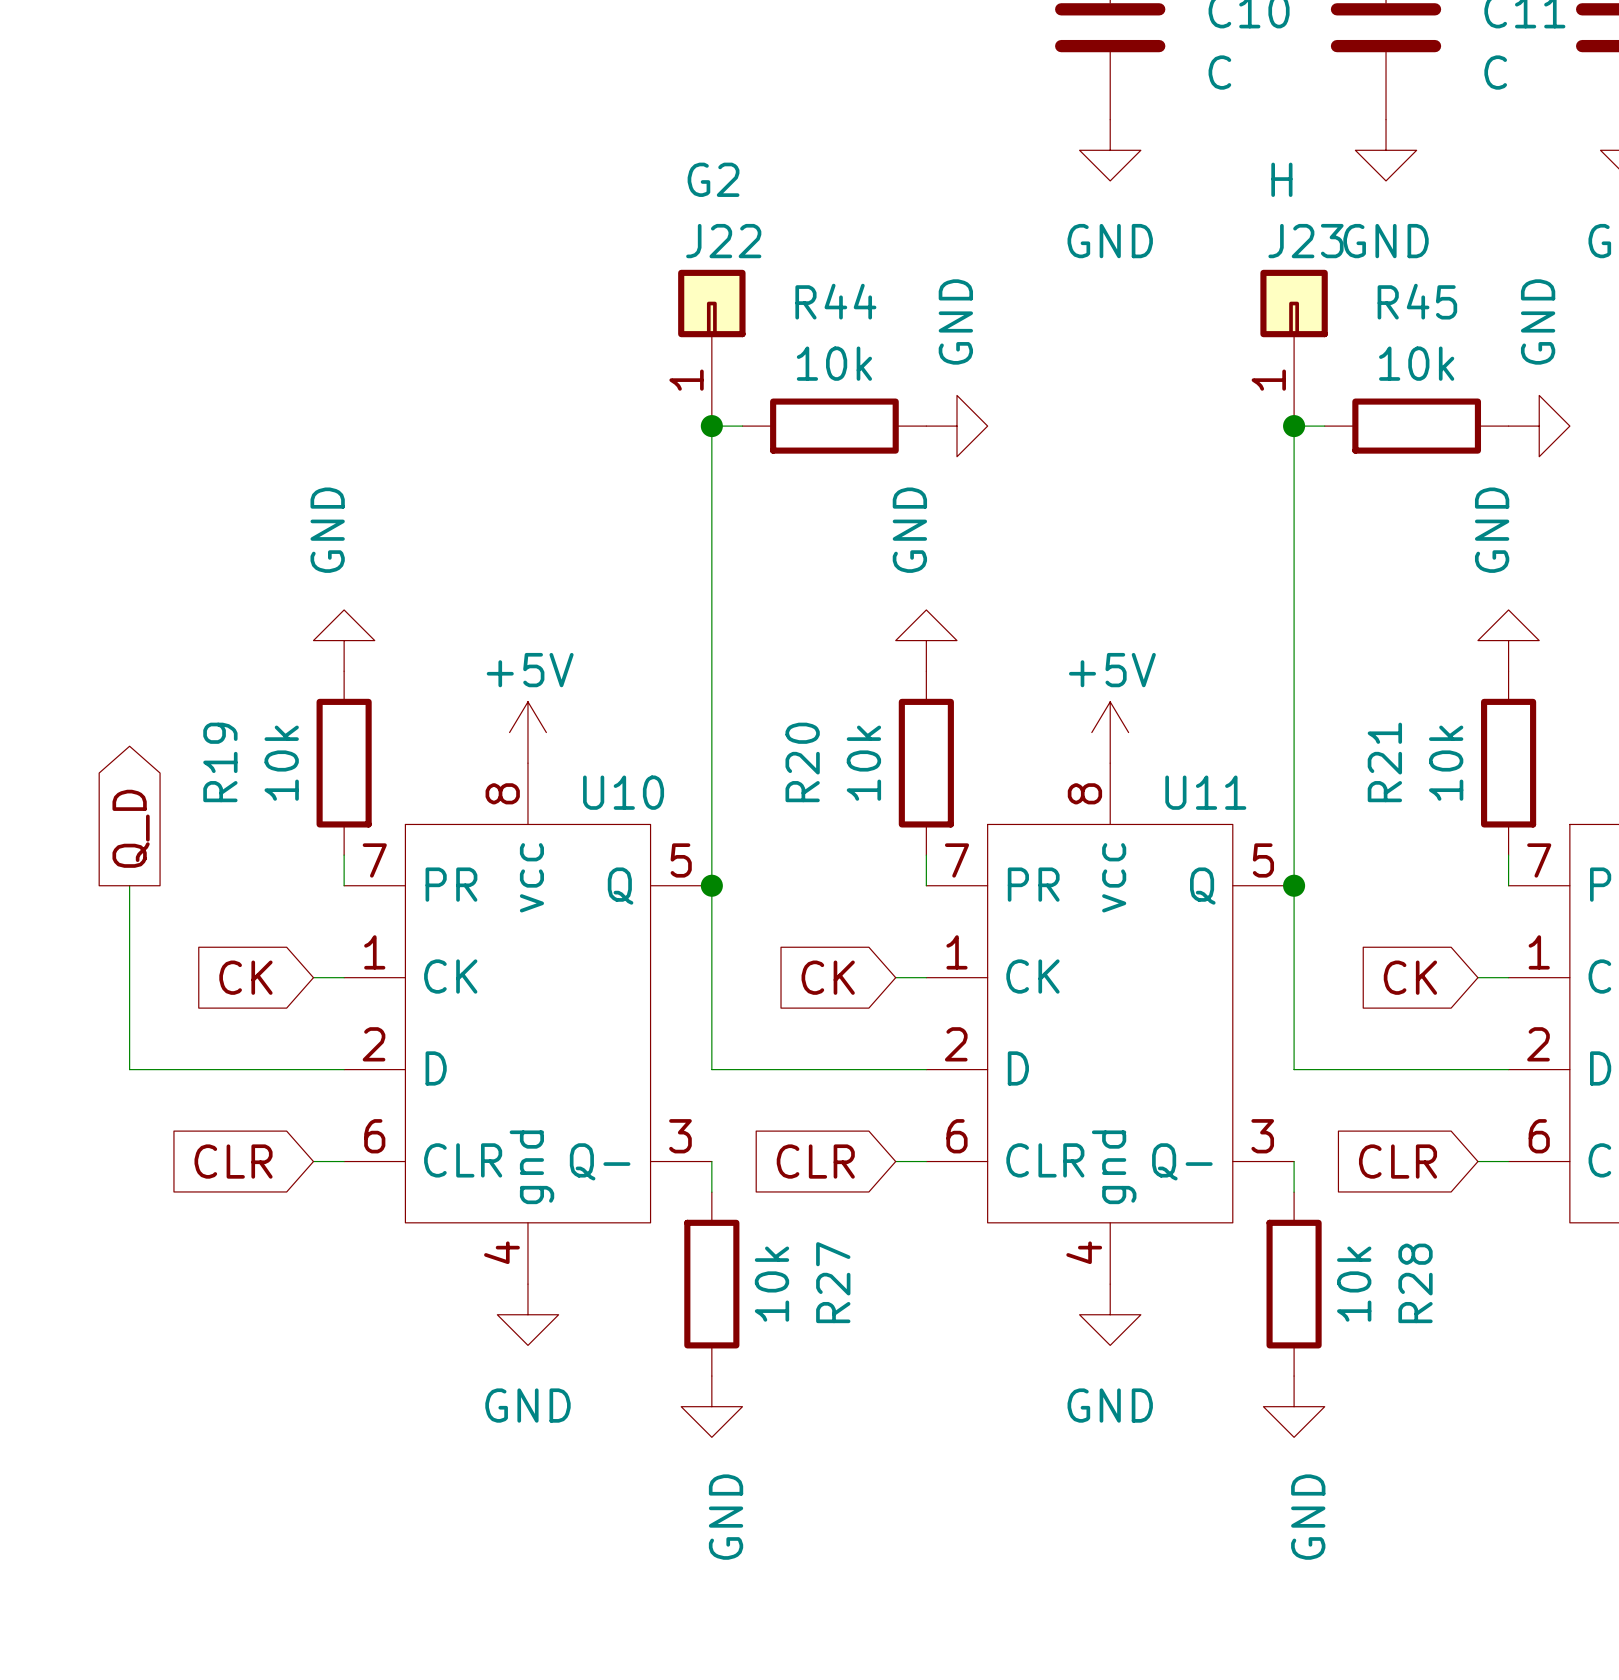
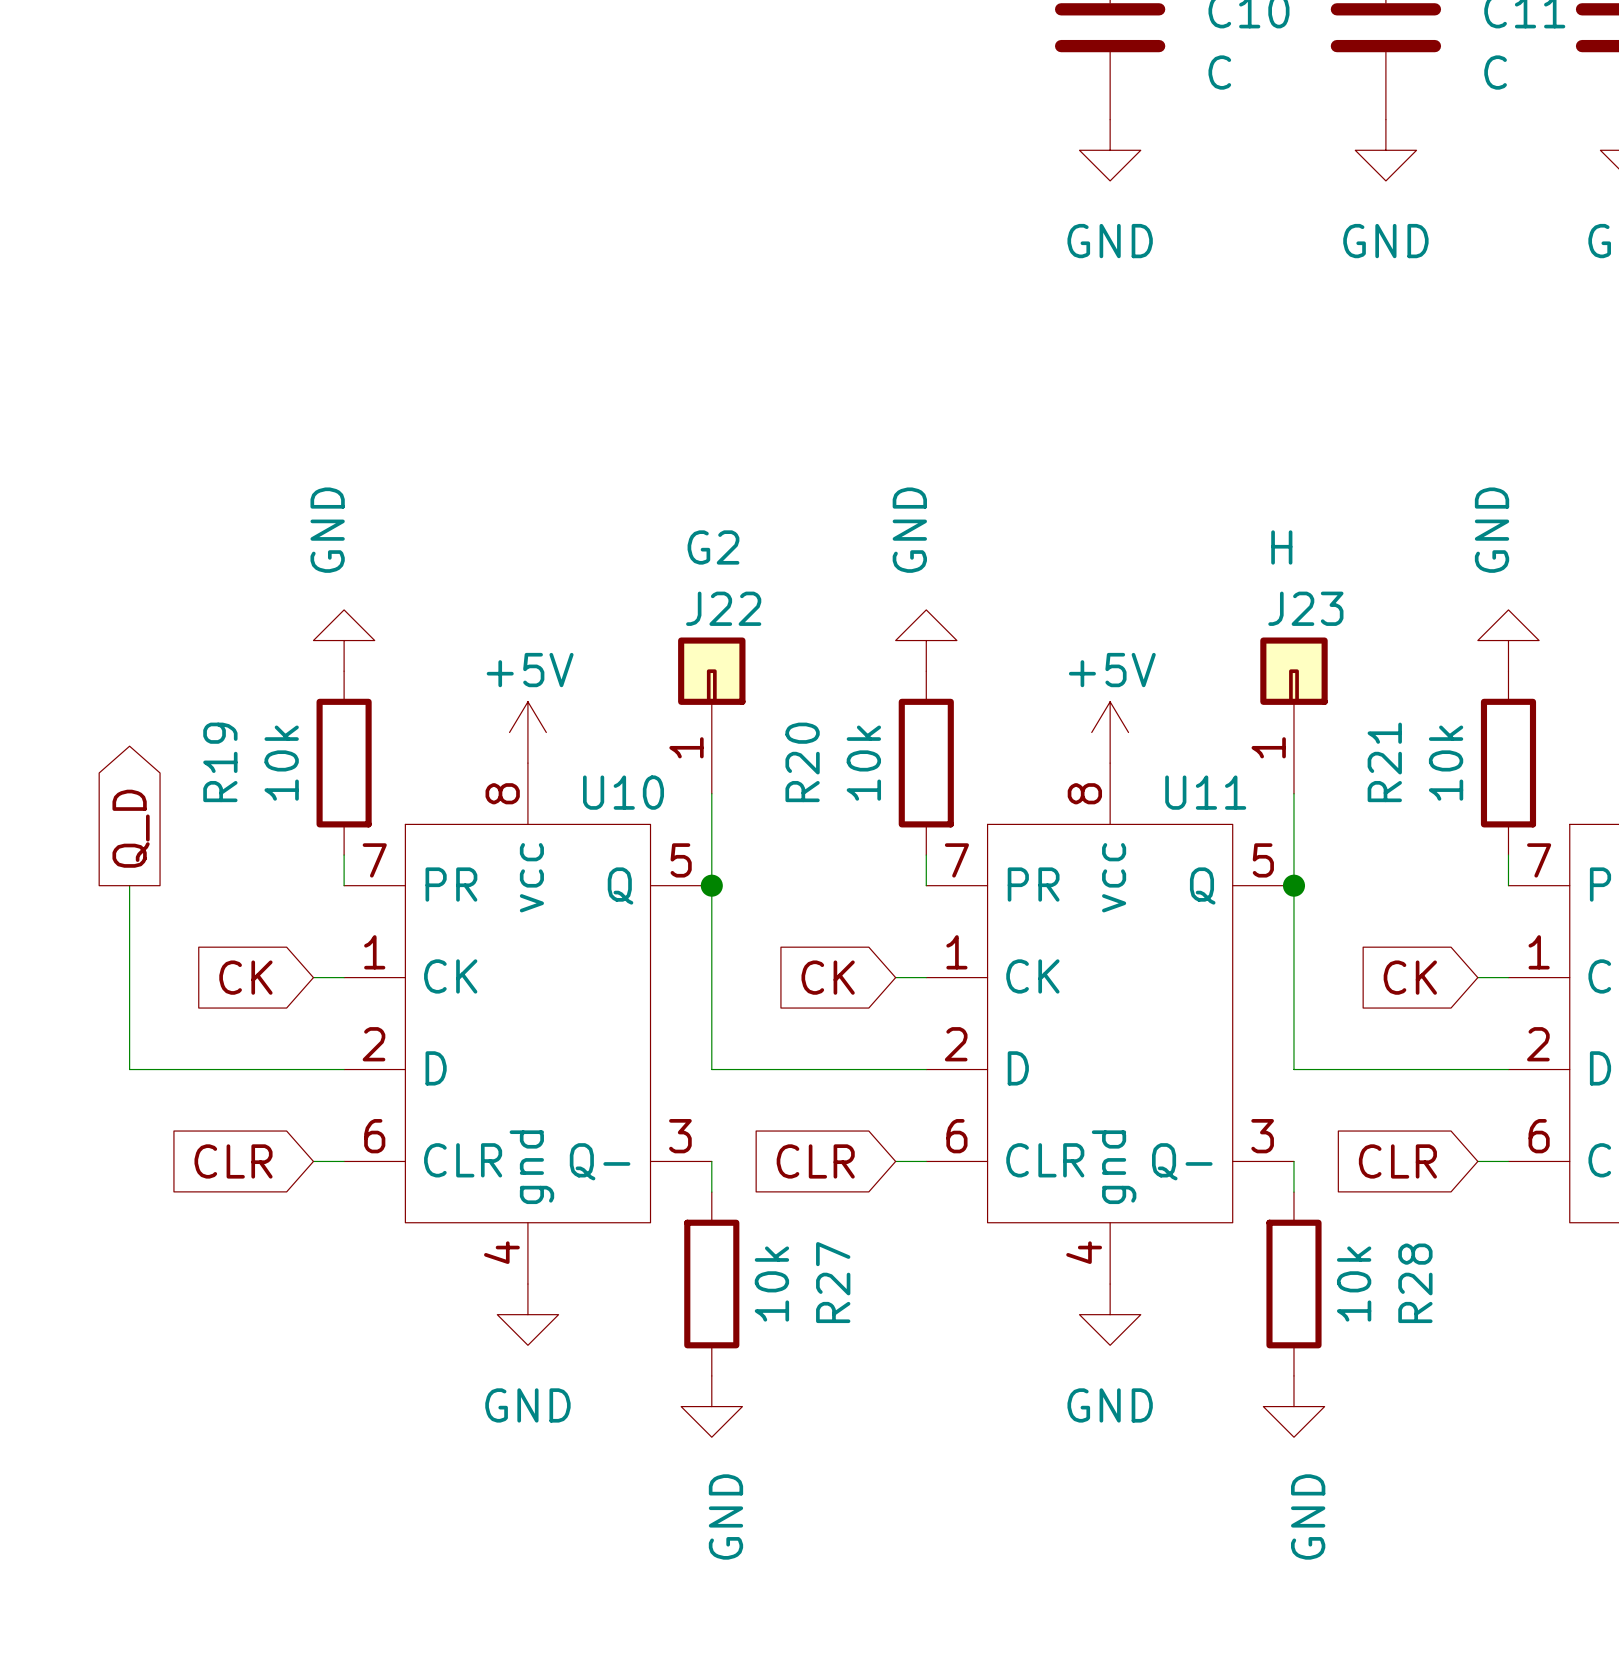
J22 position: (711, 347) -> (711, 715)
J23 position: (1294, 347) -> (1293, 715)
junction: (711, 426) -> none
wire: (742, 426) (711, 426) (711, 793) -> none
R44: 10k (834, 426) -> none
power symbol: GND (957, 426) -> none
junction: (1294, 426) -> none
wire: (1324, 426) (1294, 426) (1294, 793) -> none
R45: 10k (1416, 426) -> none
power symbol: GND (1539, 426) -> none

